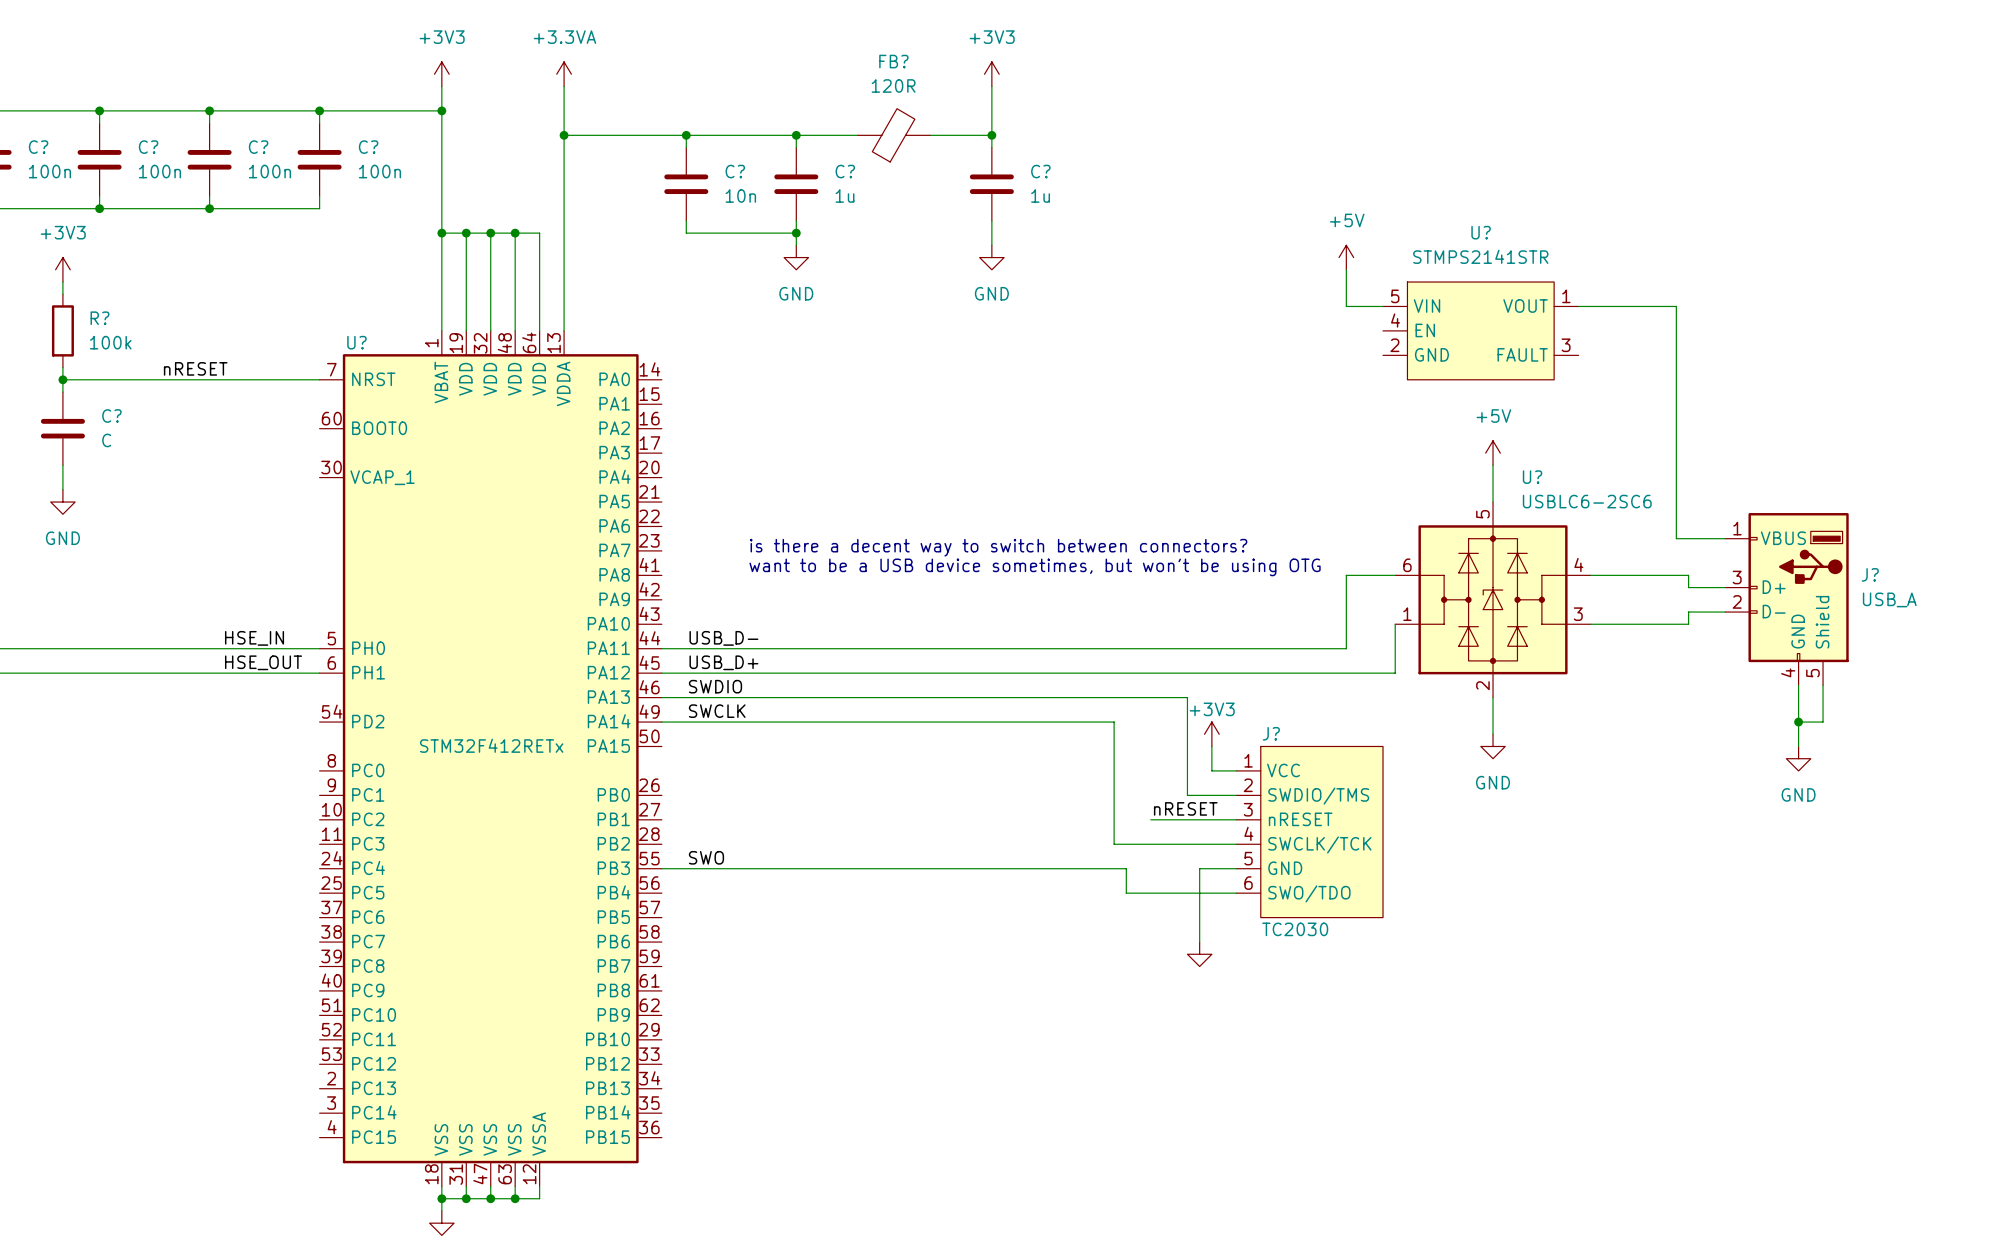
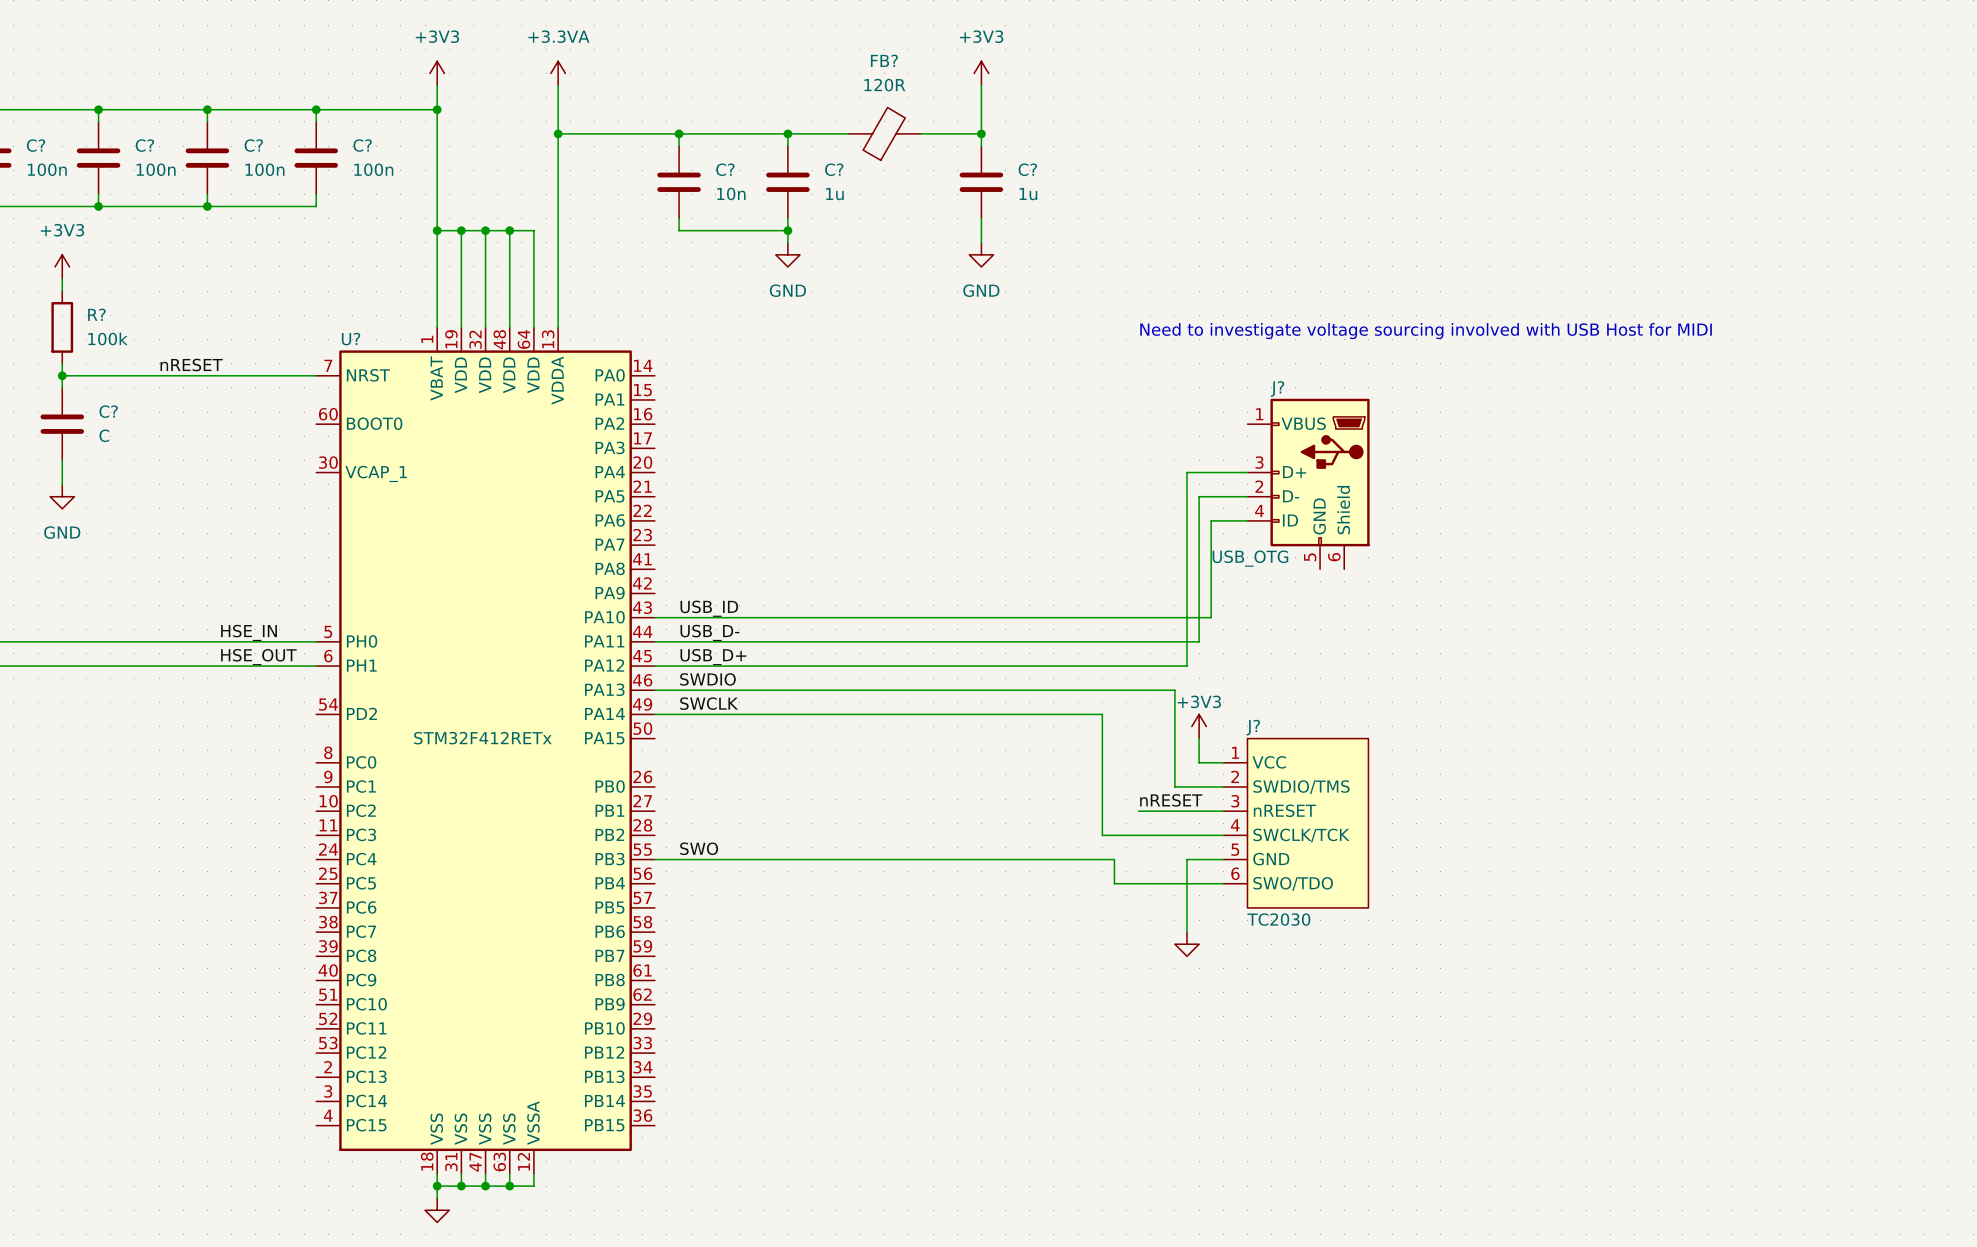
power symbol: +5V (1346, 257) -> none
wire: (1346, 269) (1346, 306) (1383, 306) -> none
wire: (1578, 306) (1676, 306) (1676, 538) (1725, 538) -> none
U?: STMPS2141STR (1480, 330) -> none
text: none -> Need to investigate voltage sourcing involved with USB Host for MIDI (1426, 331)
power symbol: +5V (1493, 453) -> none
wire: (1493, 465) (1493, 502) -> none
J?: none -> USB_OTG (1308, 484)
wire: none -> (1247, 520) (1211, 520) (1211, 617) (654, 617)
text: is there a decent way to switch between connectors? (998, 547) -> none
text: want to be a USB device sometimes, but won't be using OTG (1035, 567) -> none
wire: (1395, 575) (1346, 575) (1346, 648) (1211, 648) -> (1247, 496) (1199, 496) (1199, 641)
wire: (1590, 575) (1688, 575) (1688, 587) (1725, 587) -> none
U?: USBLC6-2SC6 (1493, 599) -> none
J?: USB_A (1786, 599) -> none
wire: (1725, 612) (1688, 612) (1688, 624) (1590, 624) -> none
label: none -> USB_ID (709, 608)
wire: (1395, 624) (1395, 673) (1199, 673) -> (1247, 472) (1187, 472) (1187, 666)
wire: (1798, 685) (1798, 746) -> none
wire: (1823, 685) (1823, 722) (1798, 722) -> none
wire: (1493, 697) (1493, 734) -> none
junction: (1798, 722) -> none
power symbol: GND (1493, 746) -> none
power symbol: GND (1798, 758) -> none

